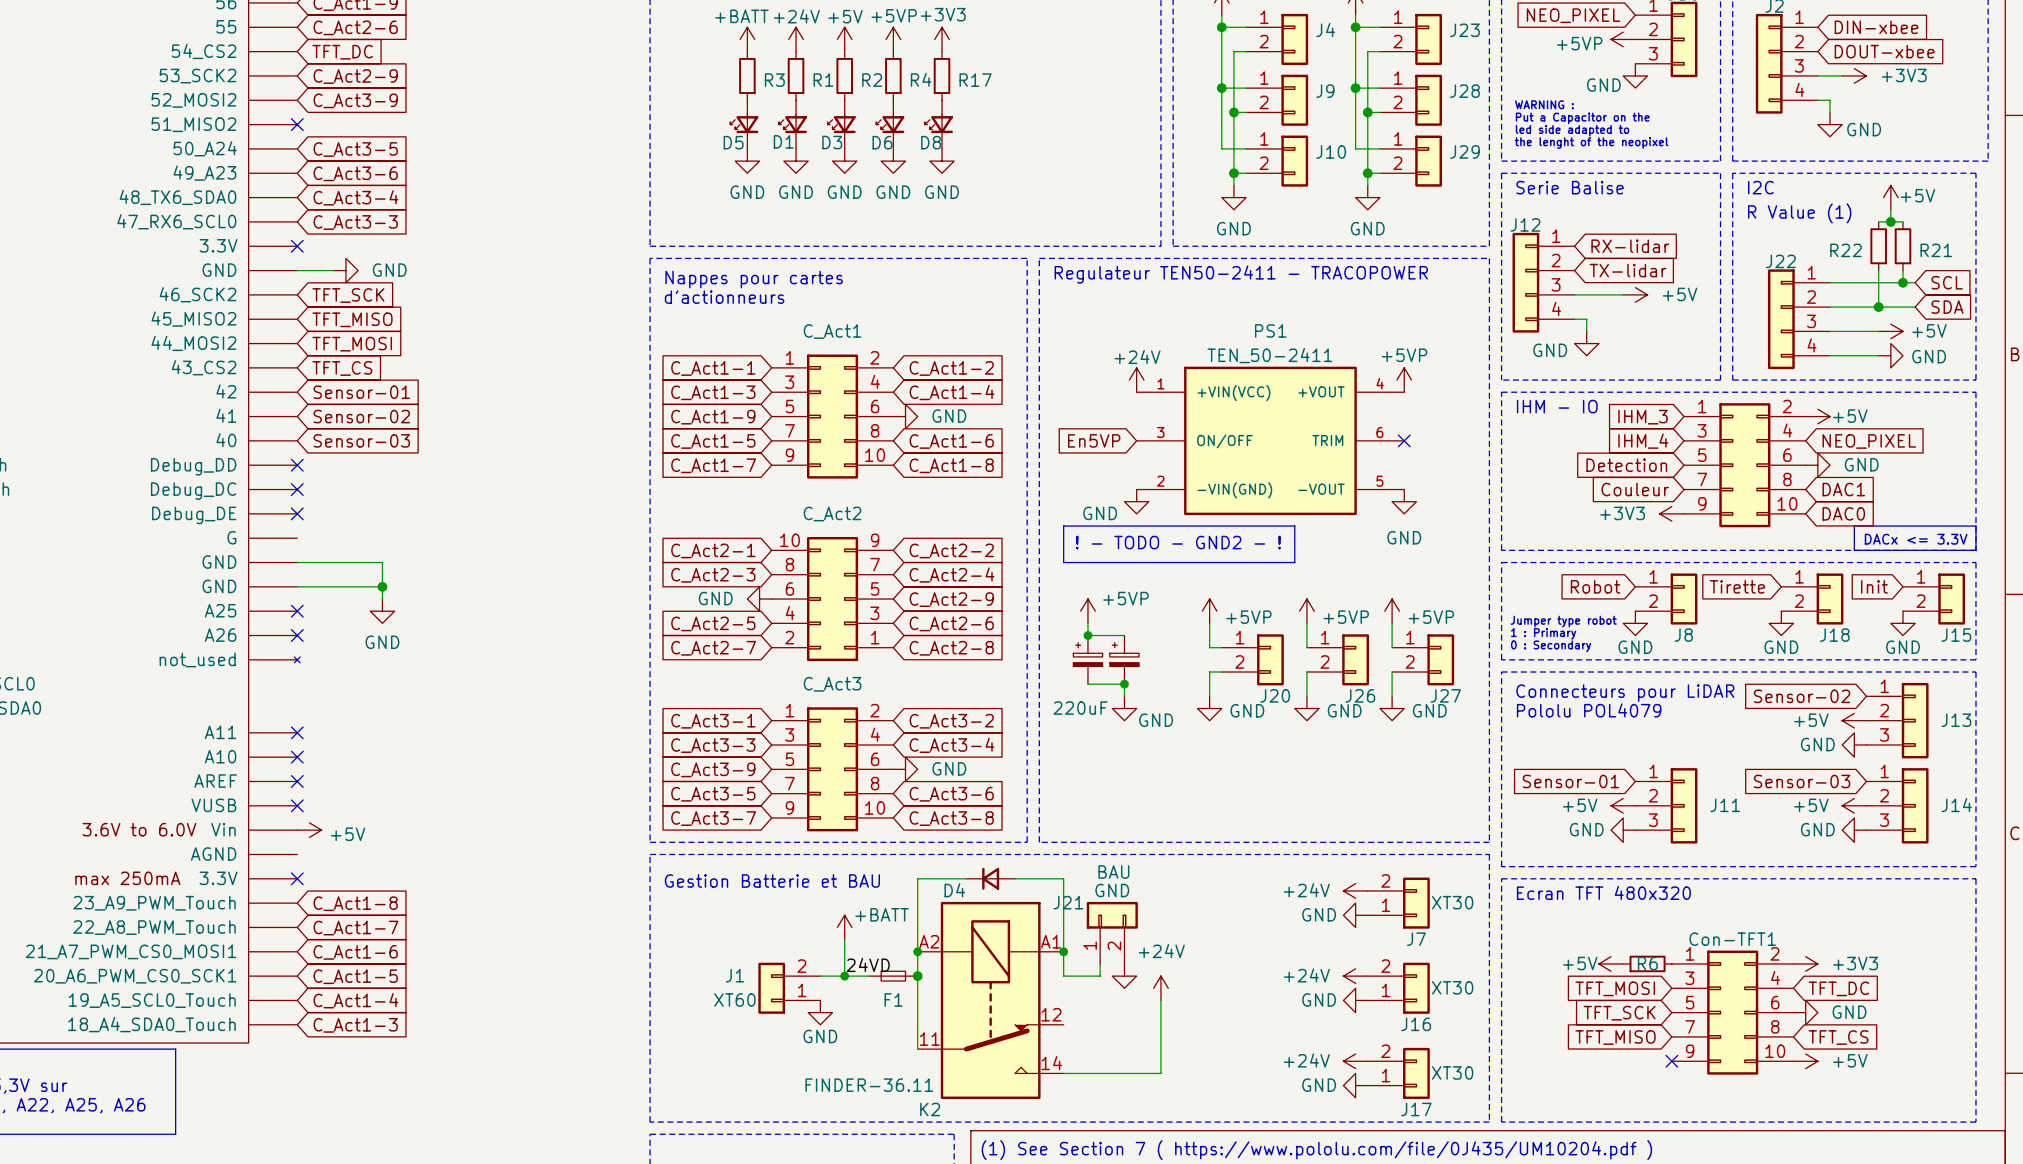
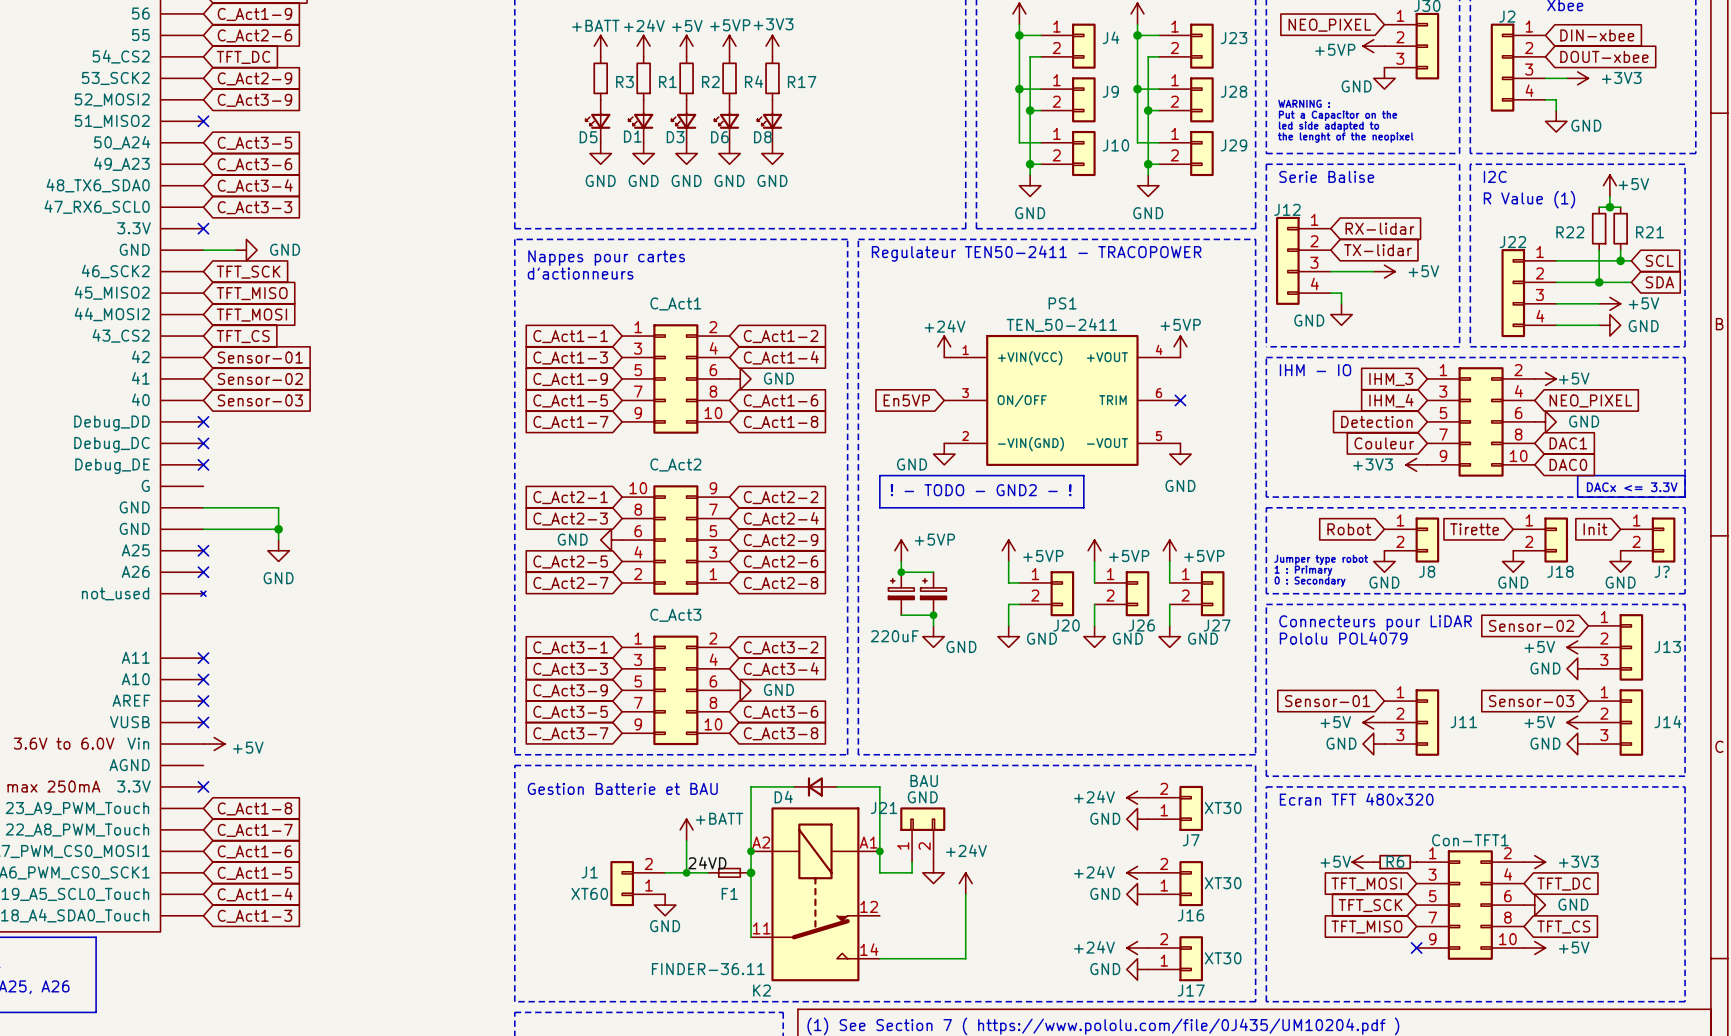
J15 name: J15 (1956, 635) -> J? (1662, 571)

